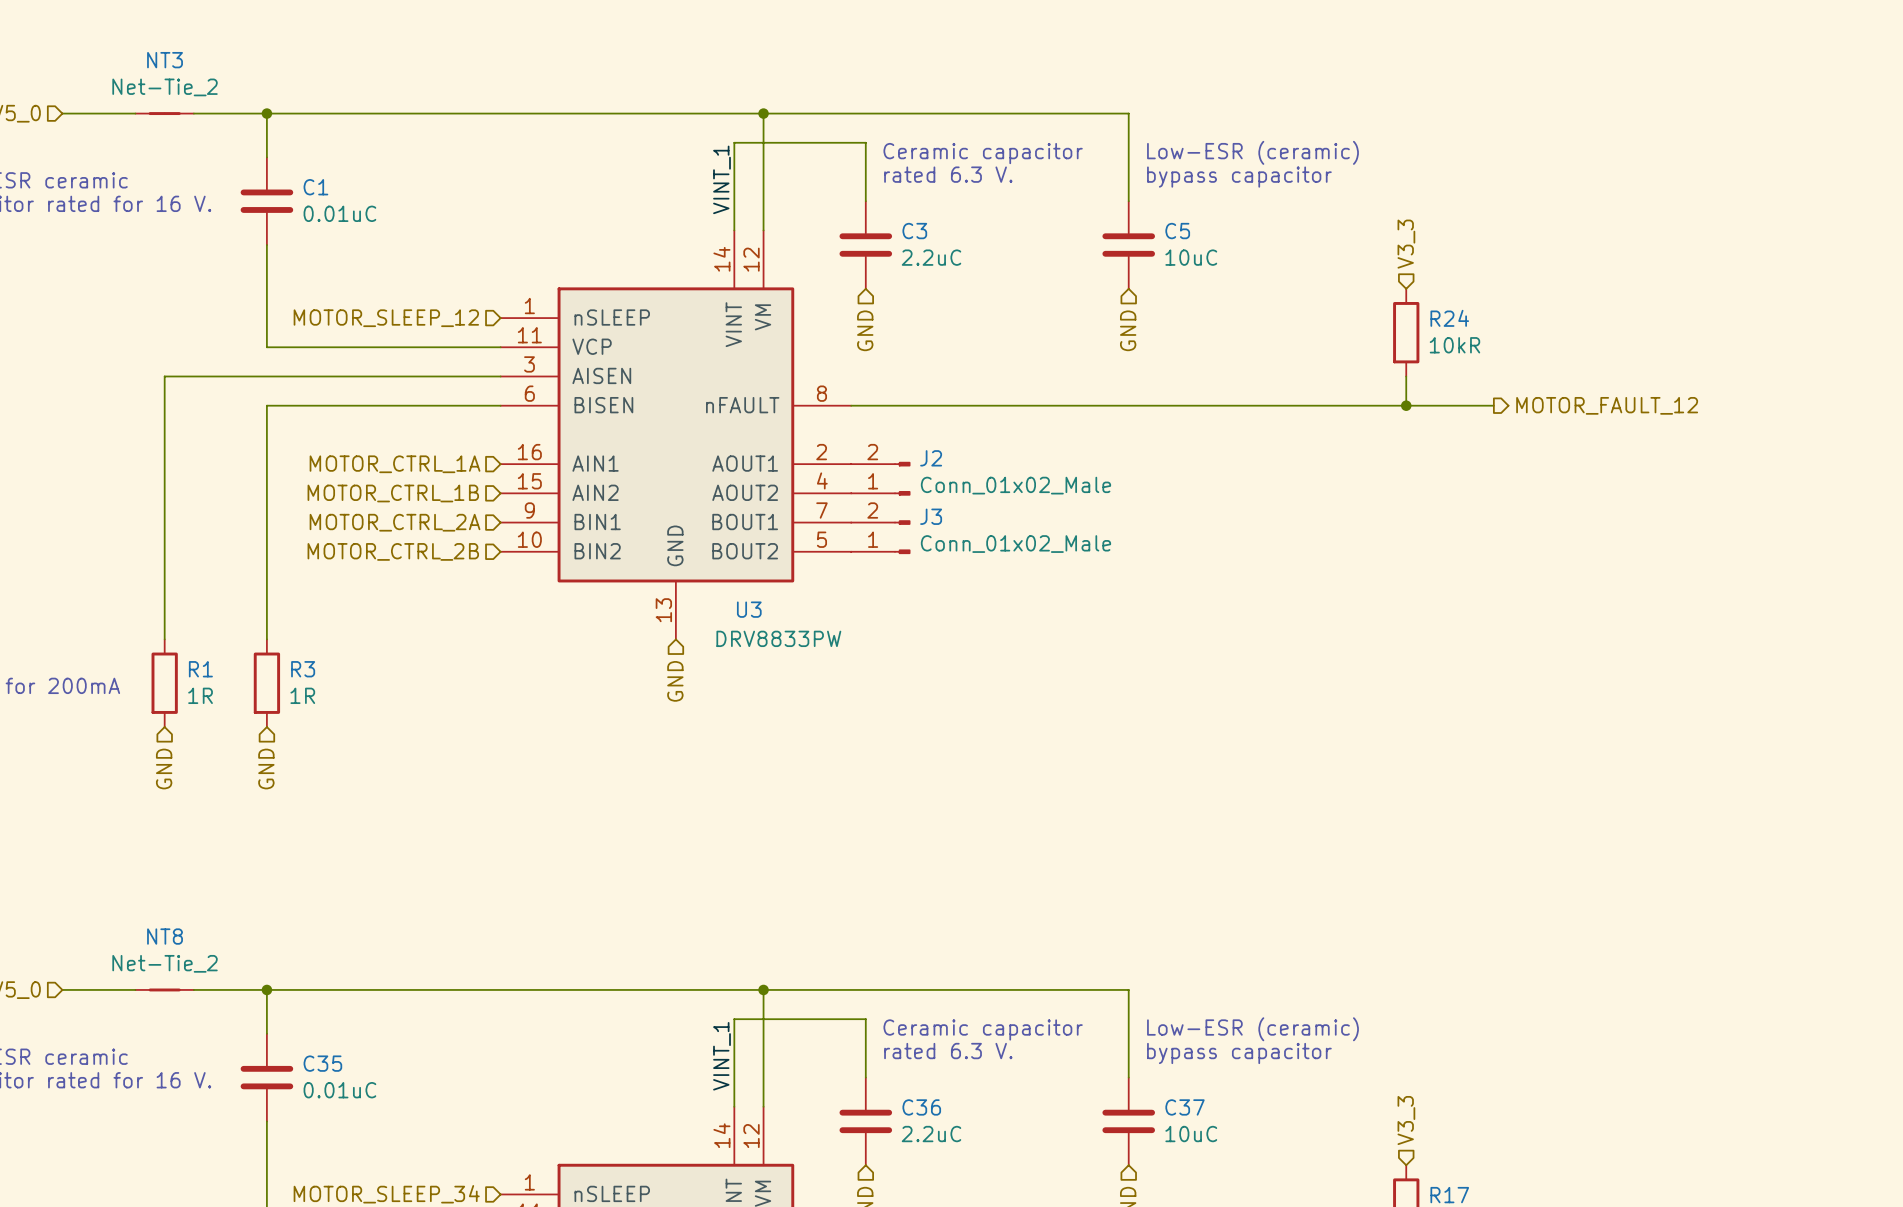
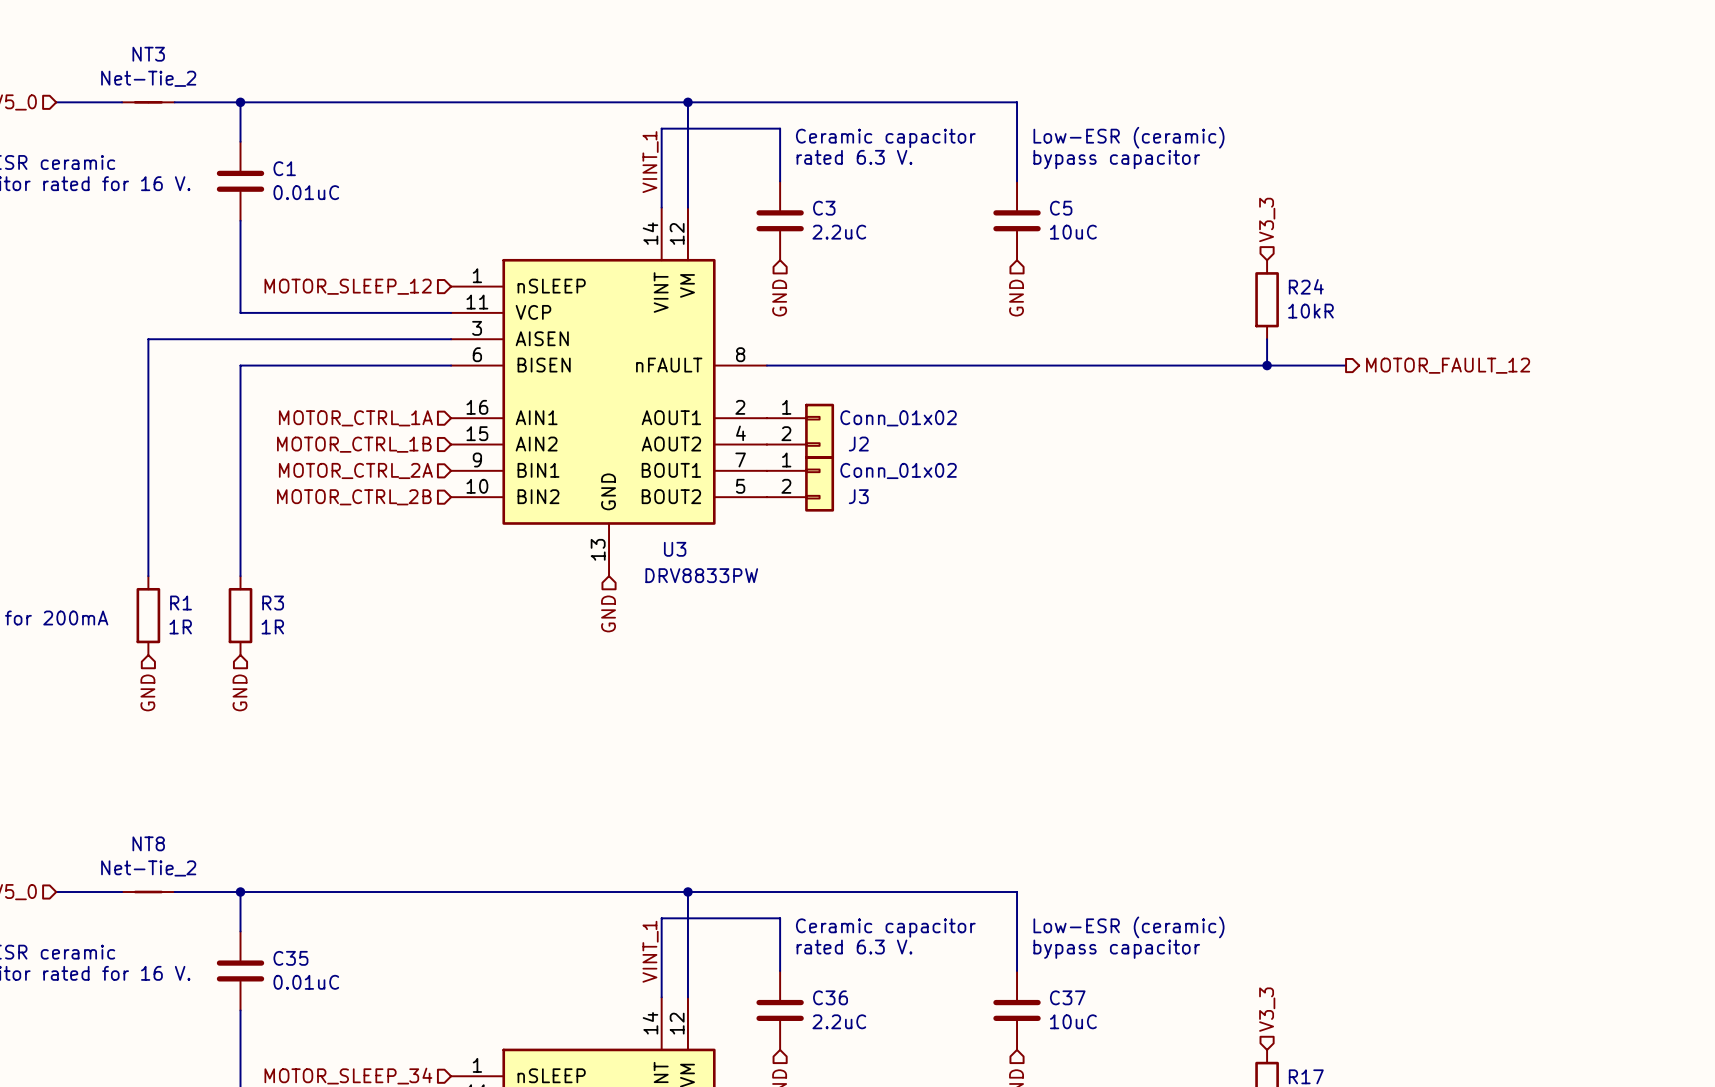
J2 name position: J2 (931, 458) -> J2 (858, 444)
J2 symbol: [851, 461, 911, 496] -> [766, 403, 835, 460]
J2 value: Conn_01x02_Male (1015, 485) -> Conn_01x02 (898, 418)
J3 name position: J3 (931, 516) -> J3 (858, 496)
J3 symbol: [851, 520, 911, 555] -> [766, 456, 835, 512]
J3 value: Conn_01x02_Male (1015, 544) -> Conn_01x02 (898, 470)

